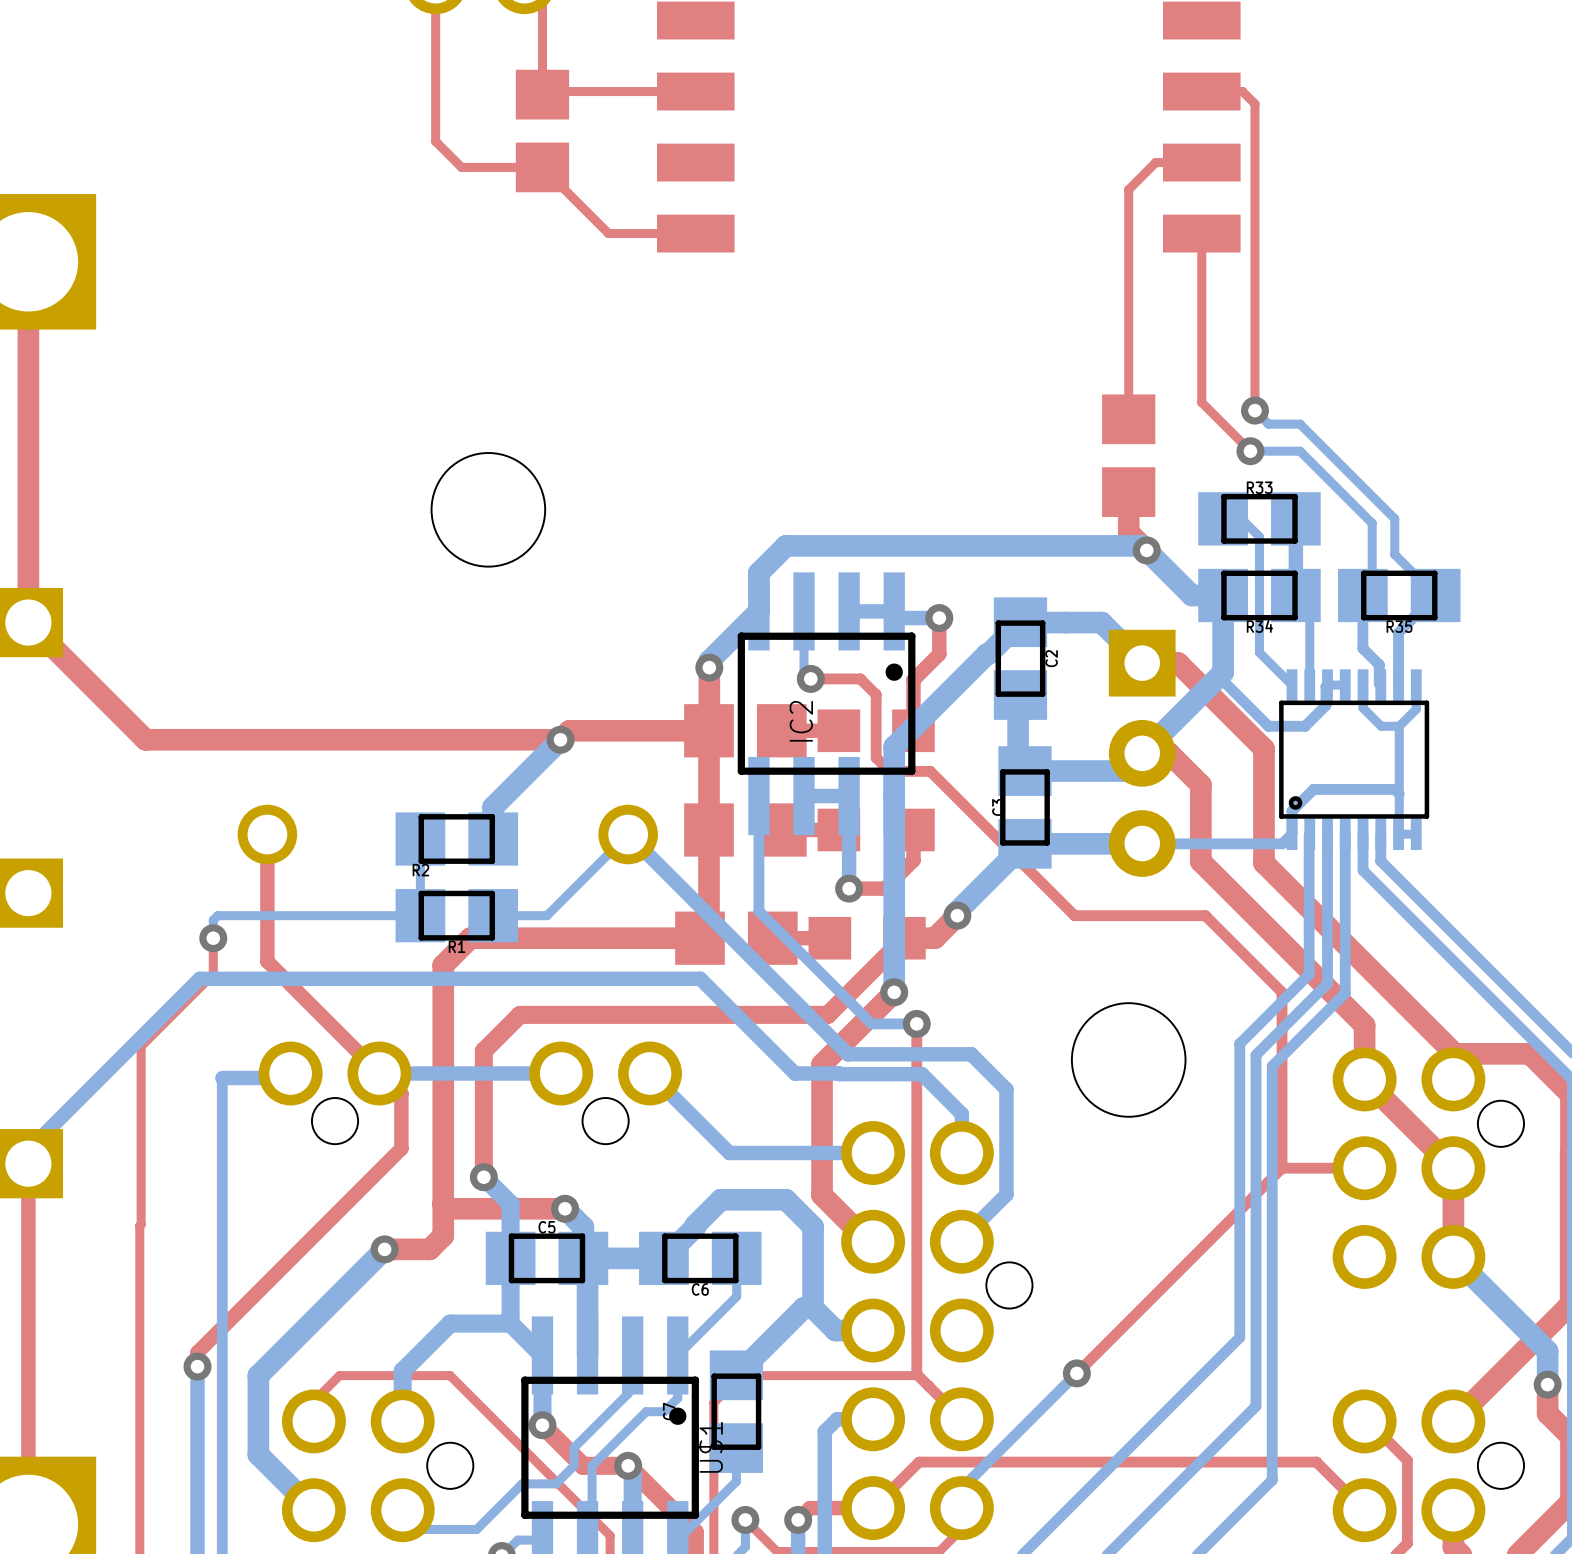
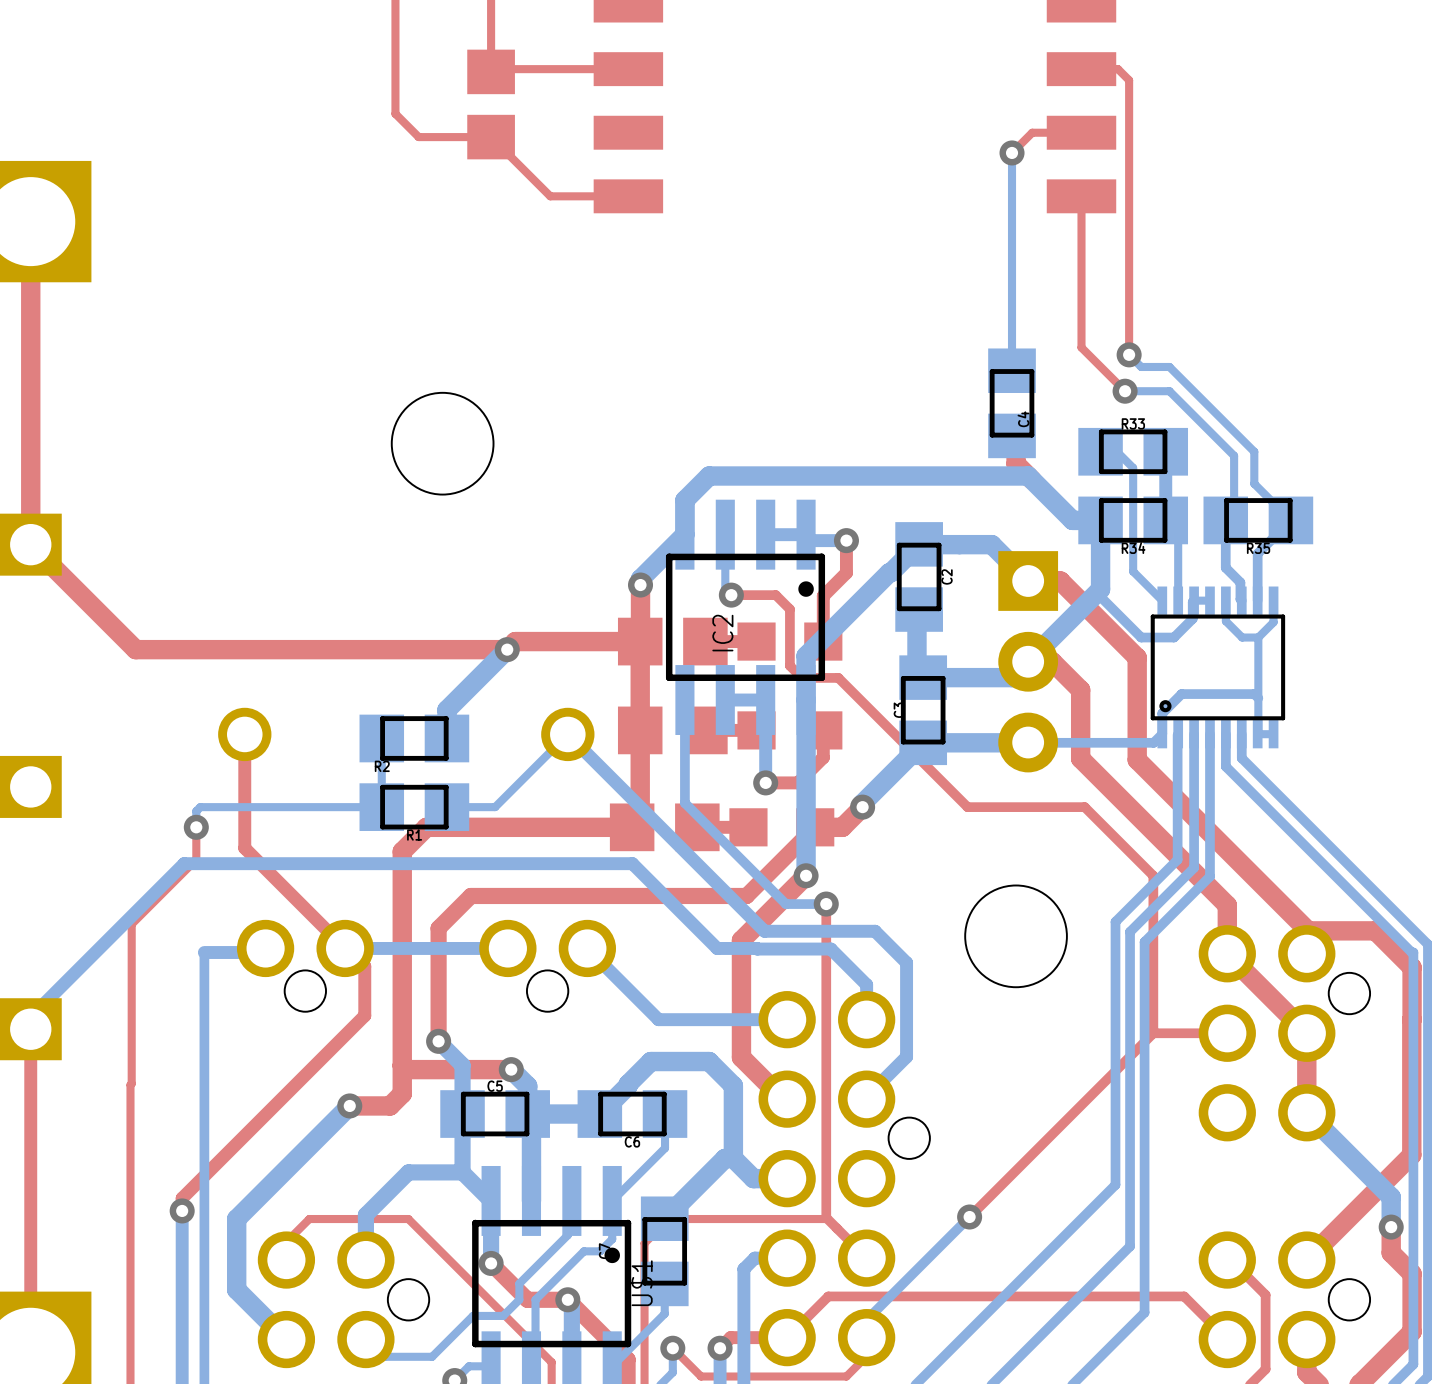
top track: (1155, 162) (1128, 189) (1128, 419) -> (1040, 132) (1032, 132) (1012, 152)
bottom track: none -> (1012, 152) (1012, 370)
via: none -> (1012, 152)
C4 side: top (1128, 455) -> bottom (1012, 403)
via: (1146, 550) -> none

